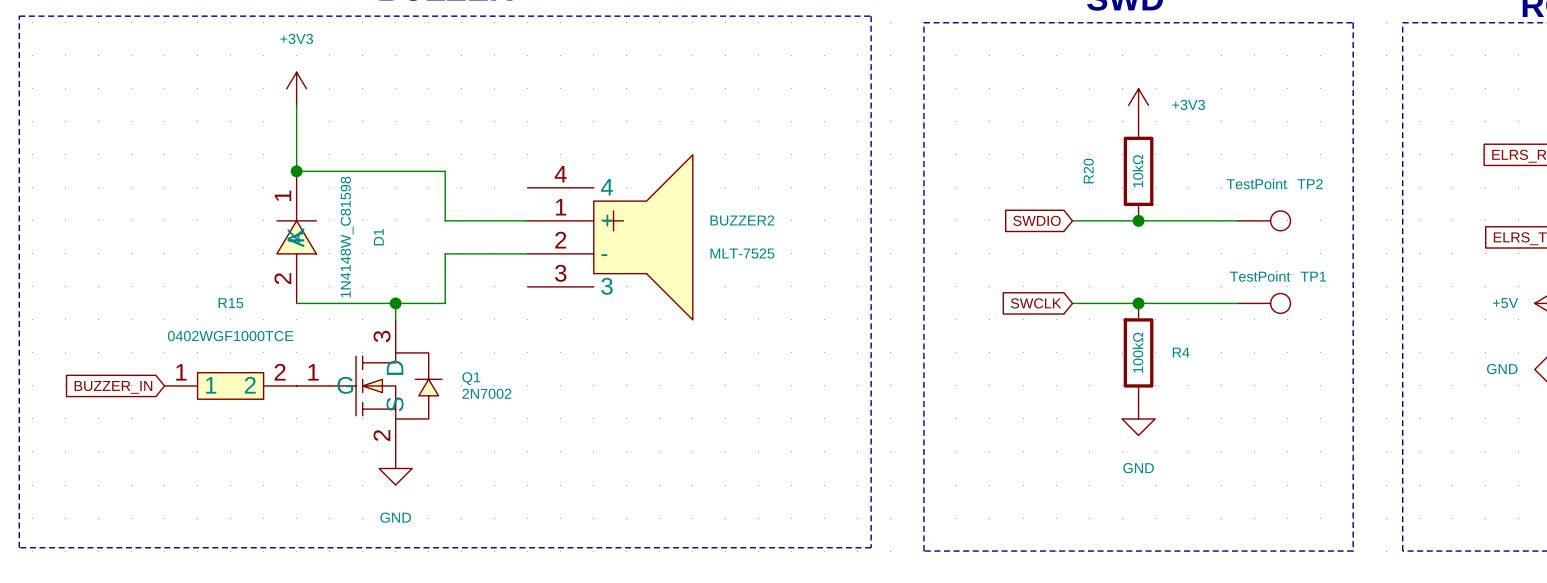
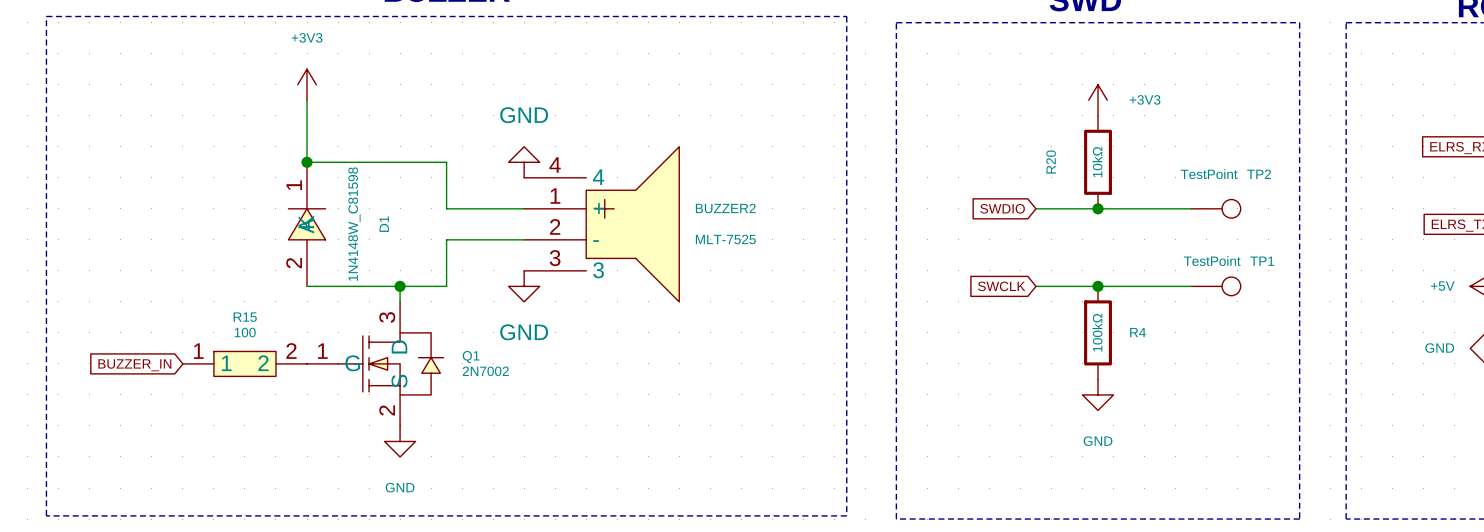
power symbol: none -> GND (524, 162)
R15 name position: R15 (230, 303) -> R15 (245, 317)
power symbol: none -> GND (524, 286)
R15 value: 0402WGF1000TCE (230, 336) -> 100 (245, 332)

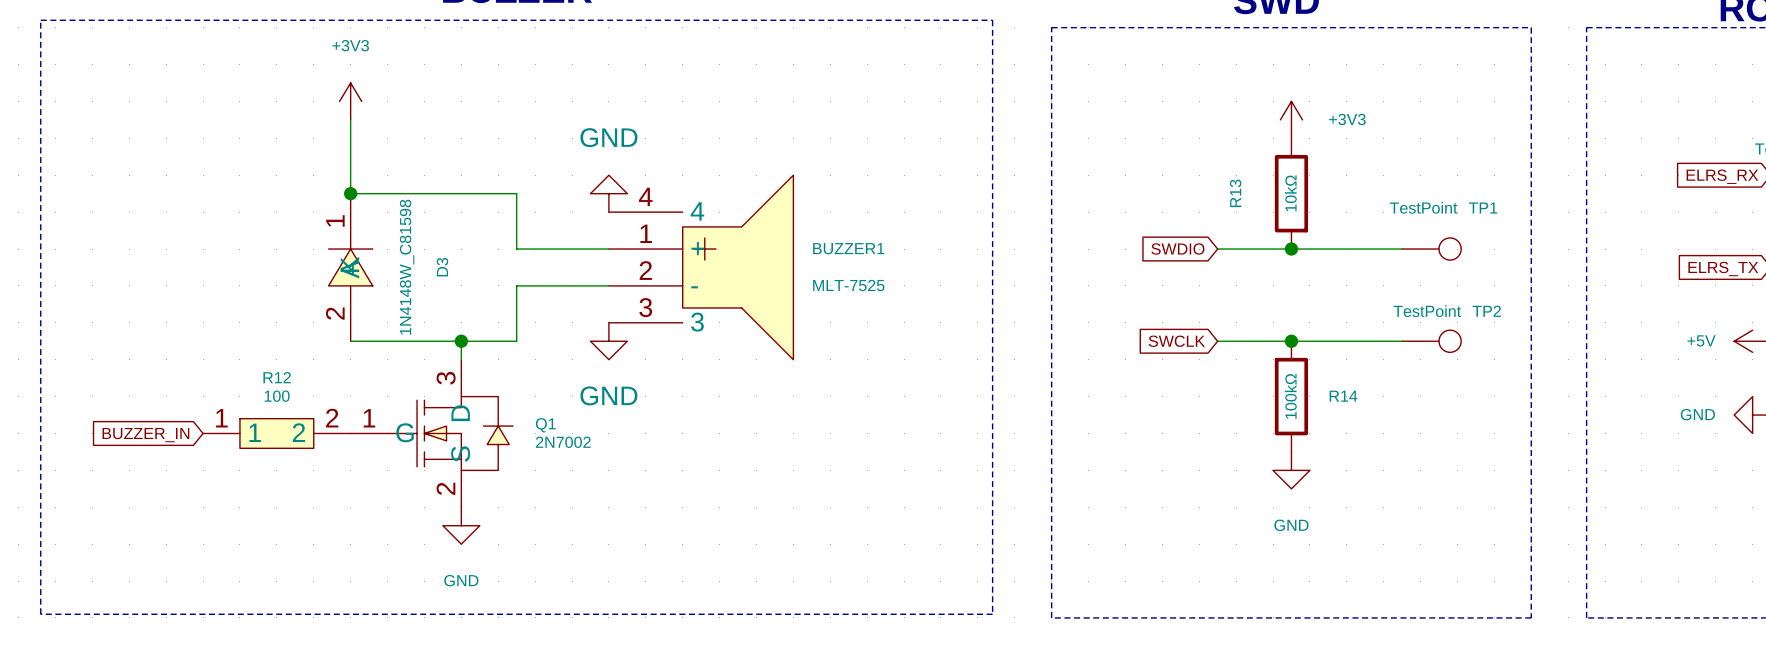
R20 name: R20 (1051, 162) -> R13 (1235, 193)
TP2 name: TP2 (1259, 174) -> TP1 (1483, 208)
BUZZER2 name: BUZZER2 (725, 208) -> BUZZER1 (848, 248)
D1 name: D1 (384, 224) -> D3 (442, 267)
TP1 name: TP1 (1262, 261) -> TP2 (1486, 311)
R15 name: R15 (245, 317) -> R12 (277, 377)
R4 name: R4 (1138, 332) -> R14 (1343, 396)

